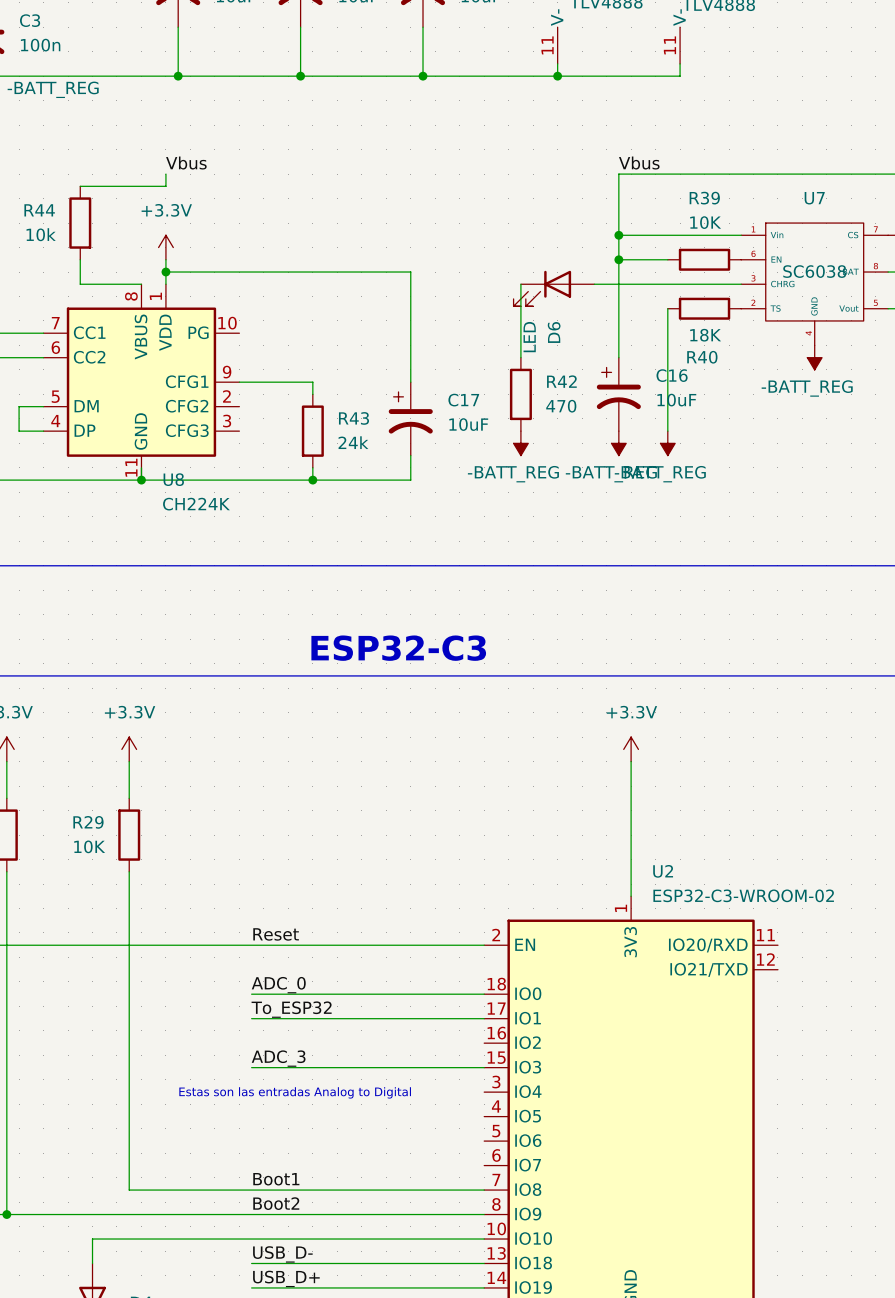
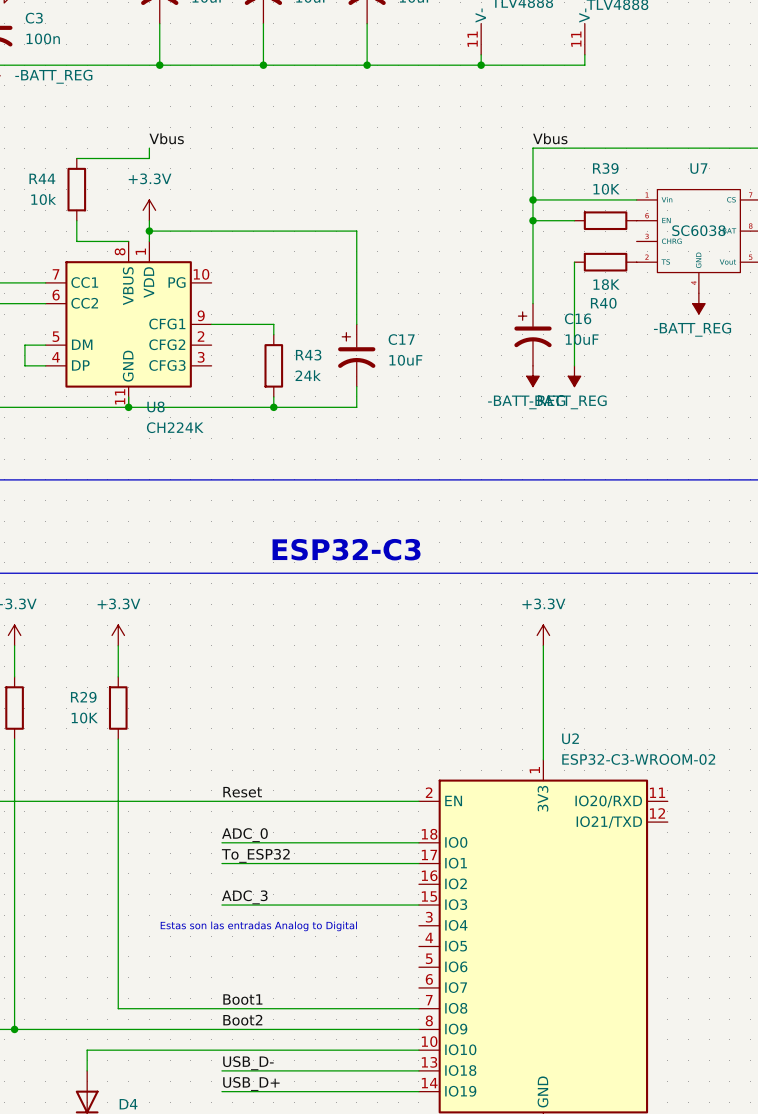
wire: (520, 284) (520, 357) -> none
wire: (594, 284) (741, 284) -> none
D6: LED (553, 288) -> none
R42: 470 (520, 394) -> none
power symbol: -BATT_REG (520, 443) -> none

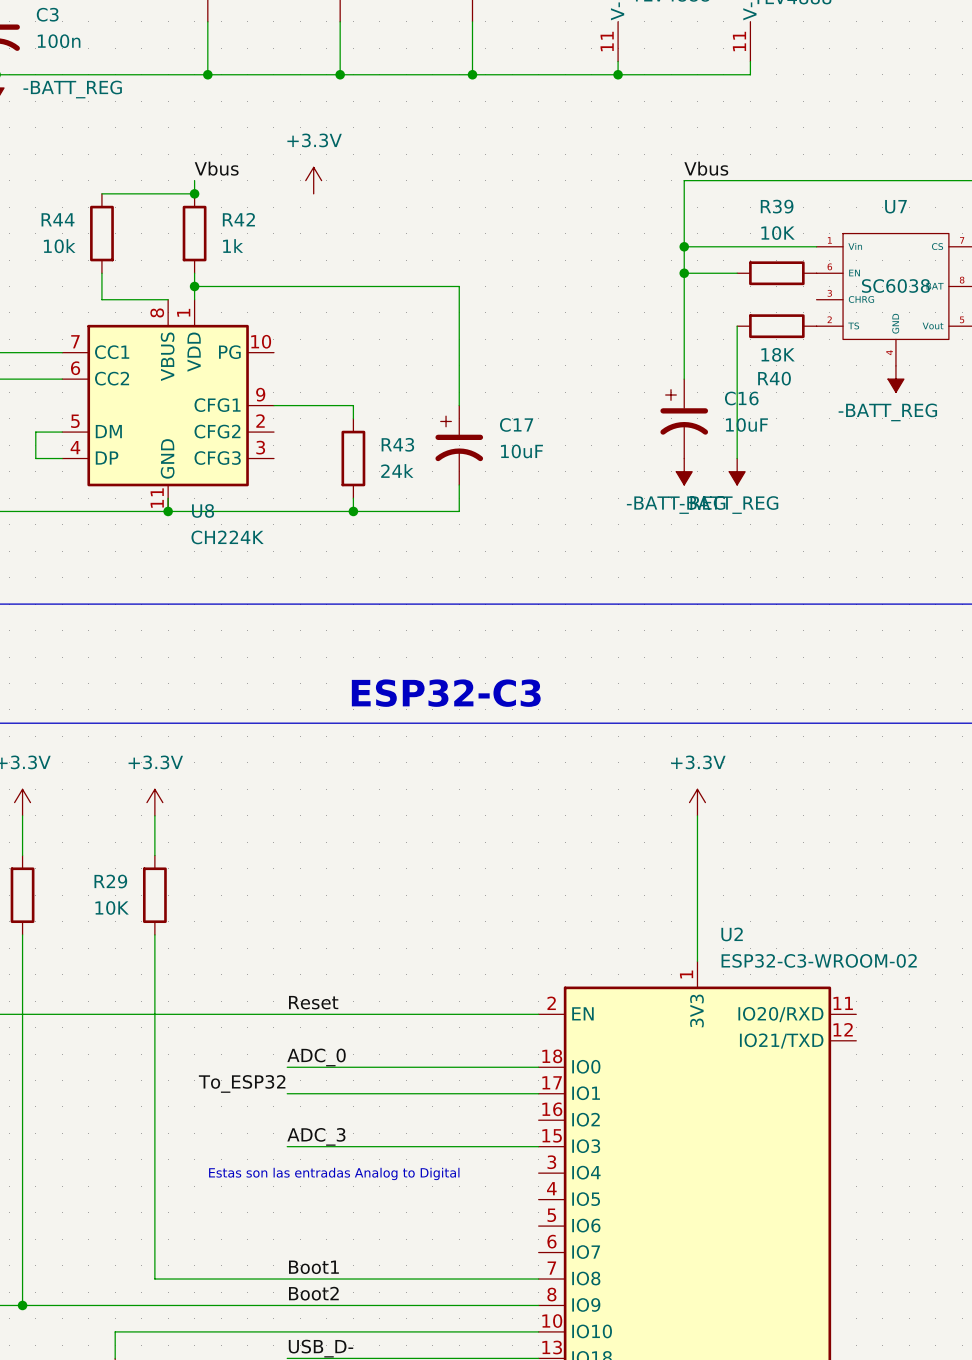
junction: none -> (194, 193)
R42: none -> 1k (194, 233)
power symbol position: +3.3V (149, 210) -> +3.3V (313, 180)
label position: To_ESP32 (255, 855) -> To_ESP32 (242, 1083)

